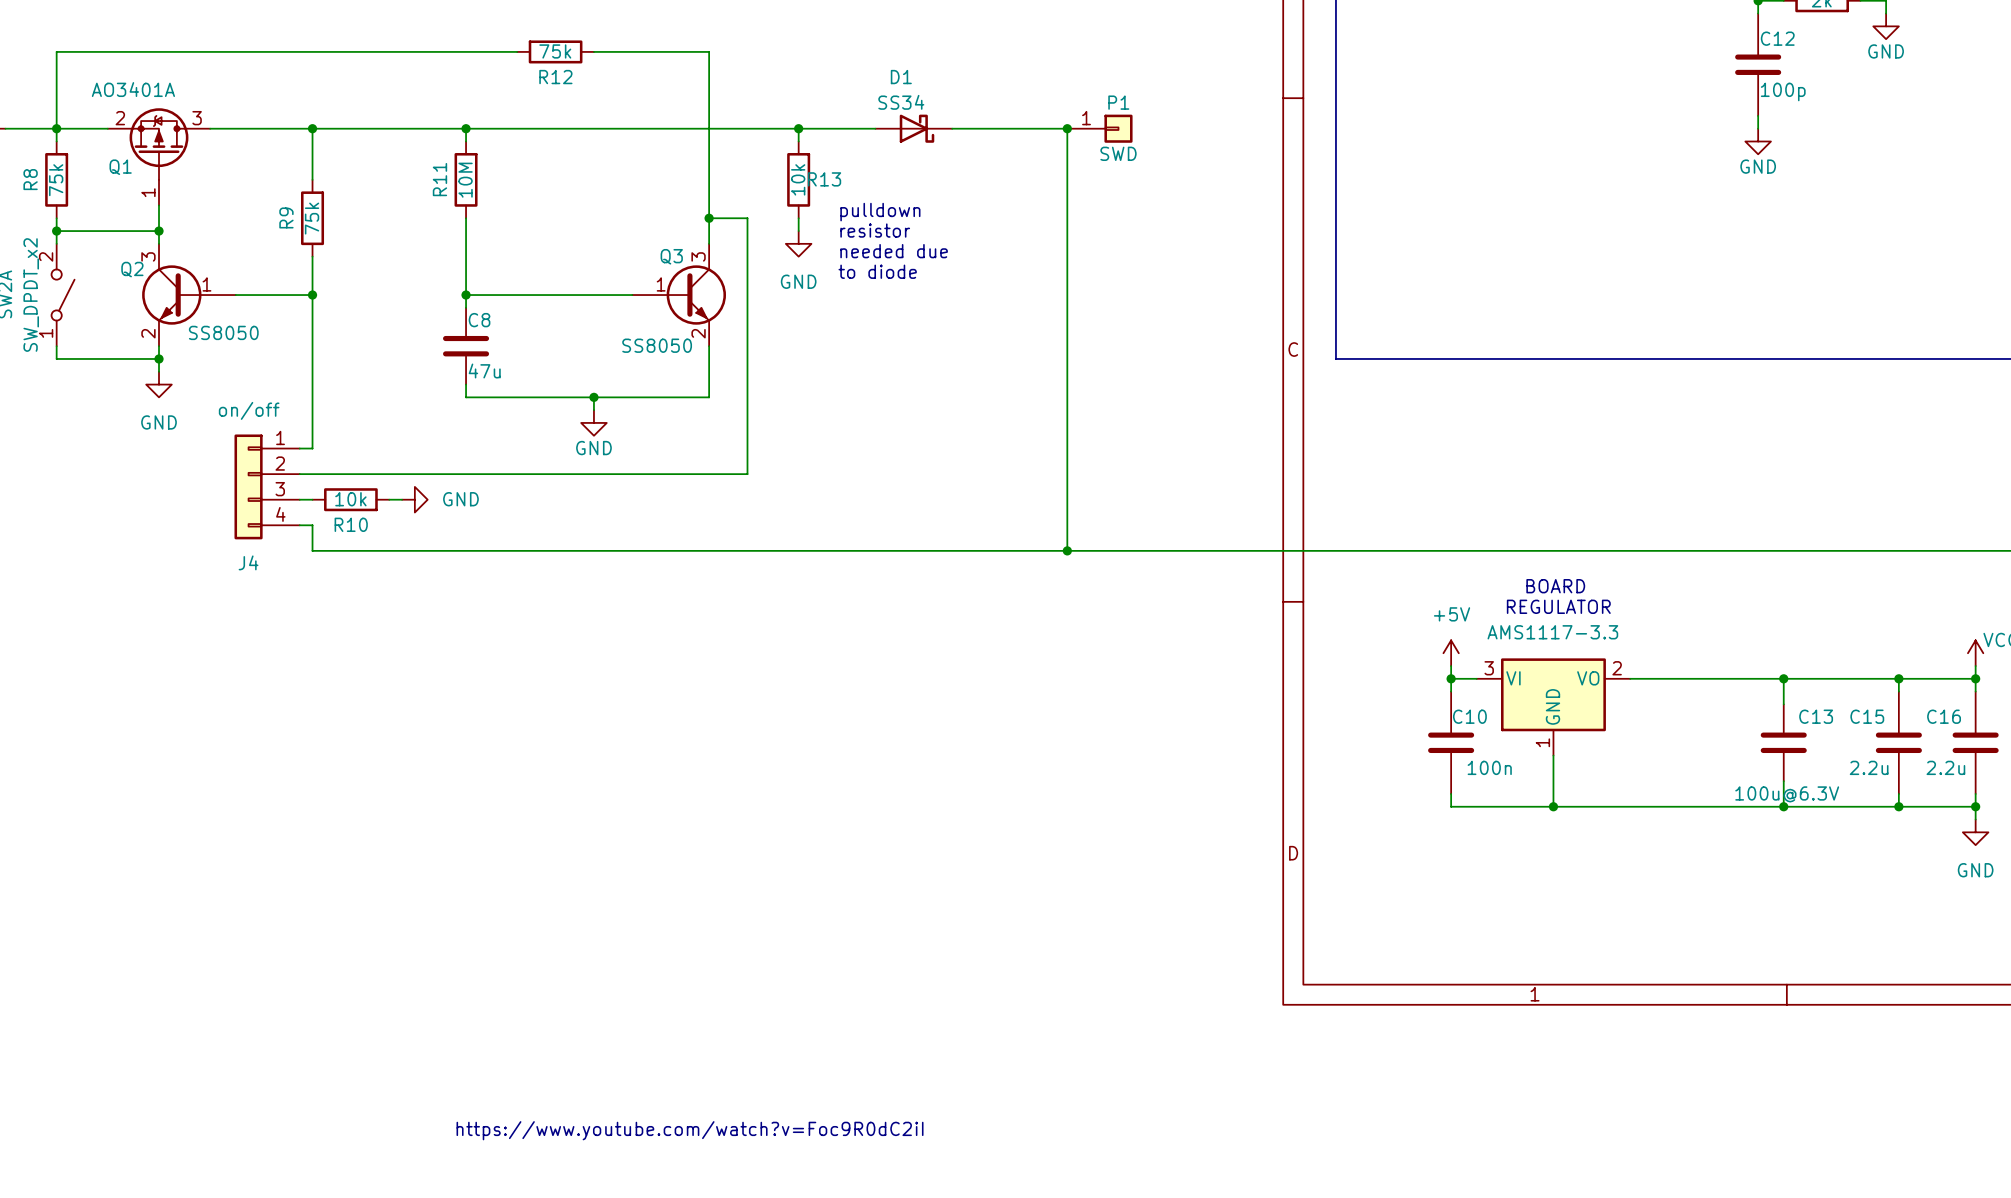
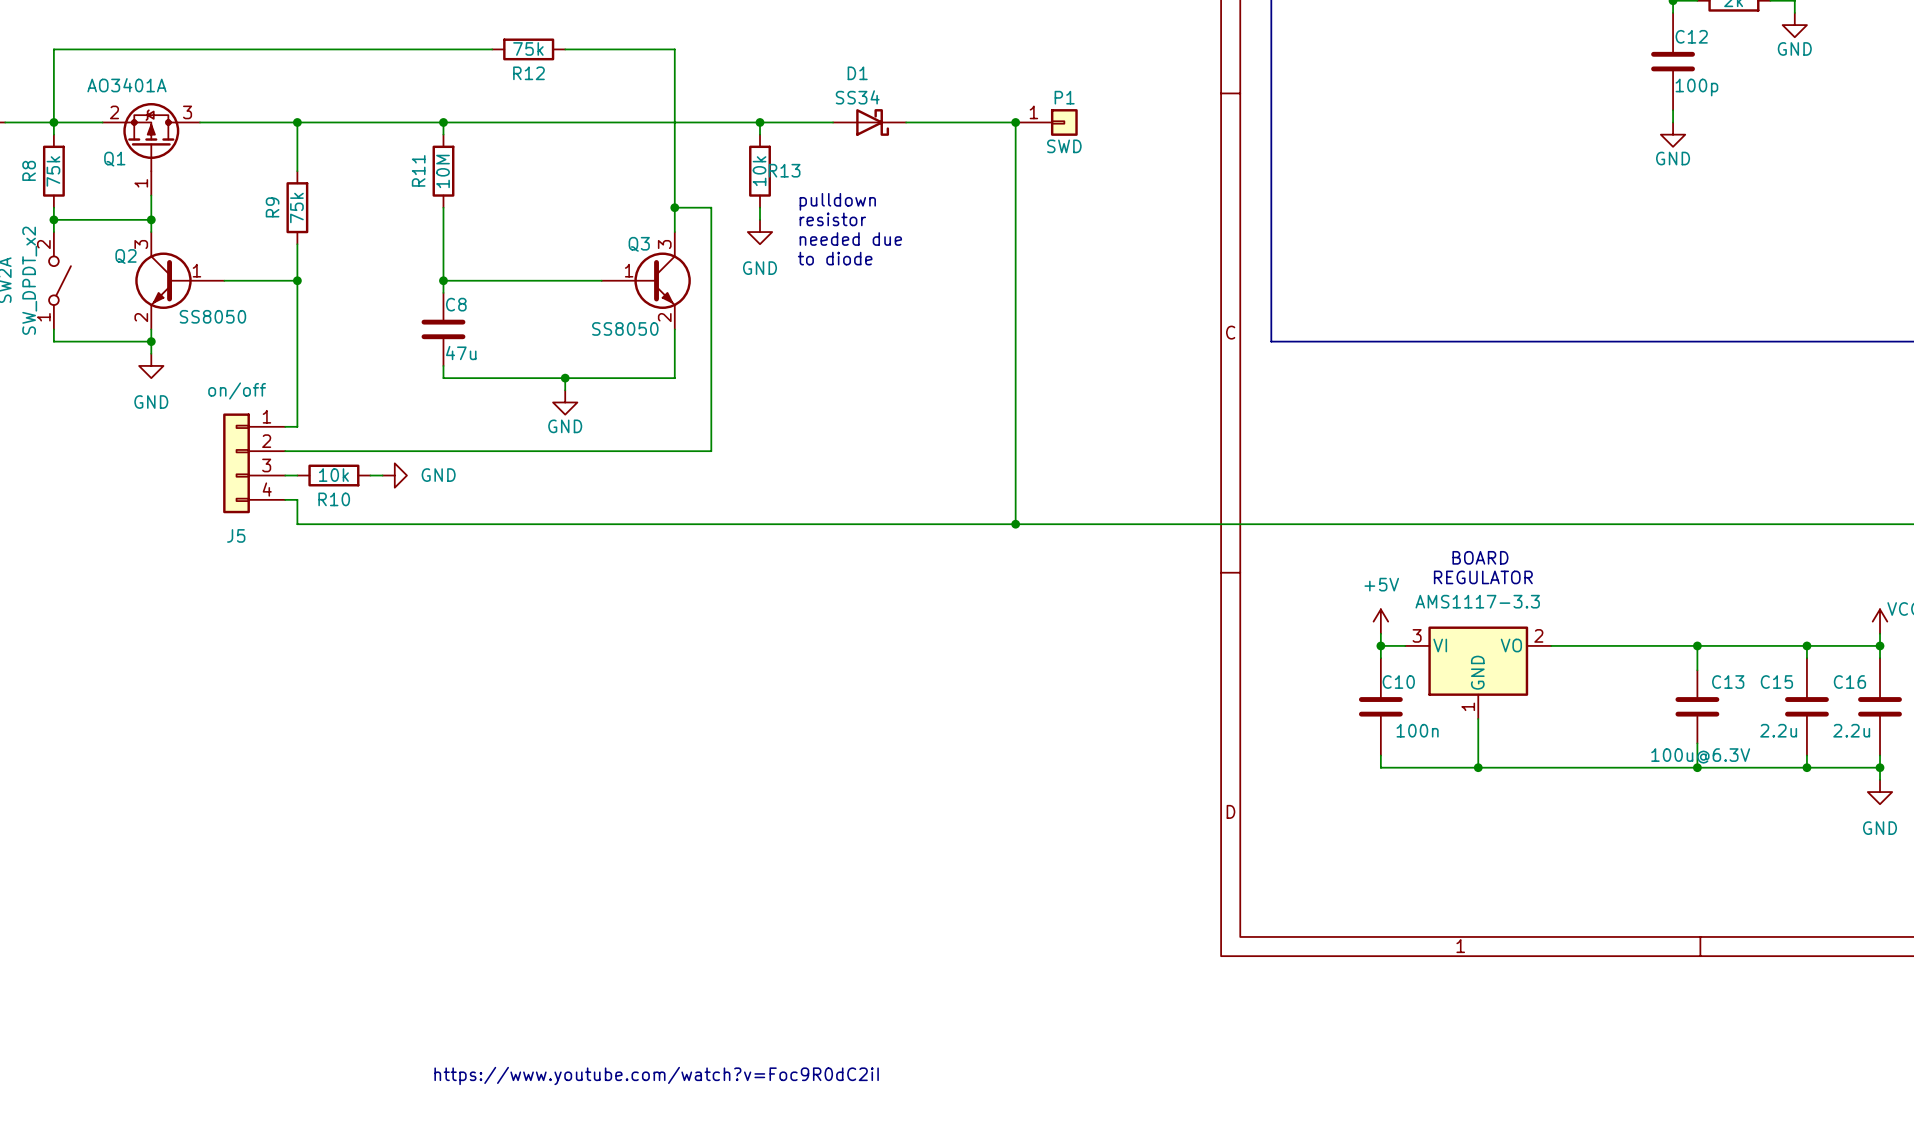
J4 name: J4 (248, 562) -> J5 (236, 535)

